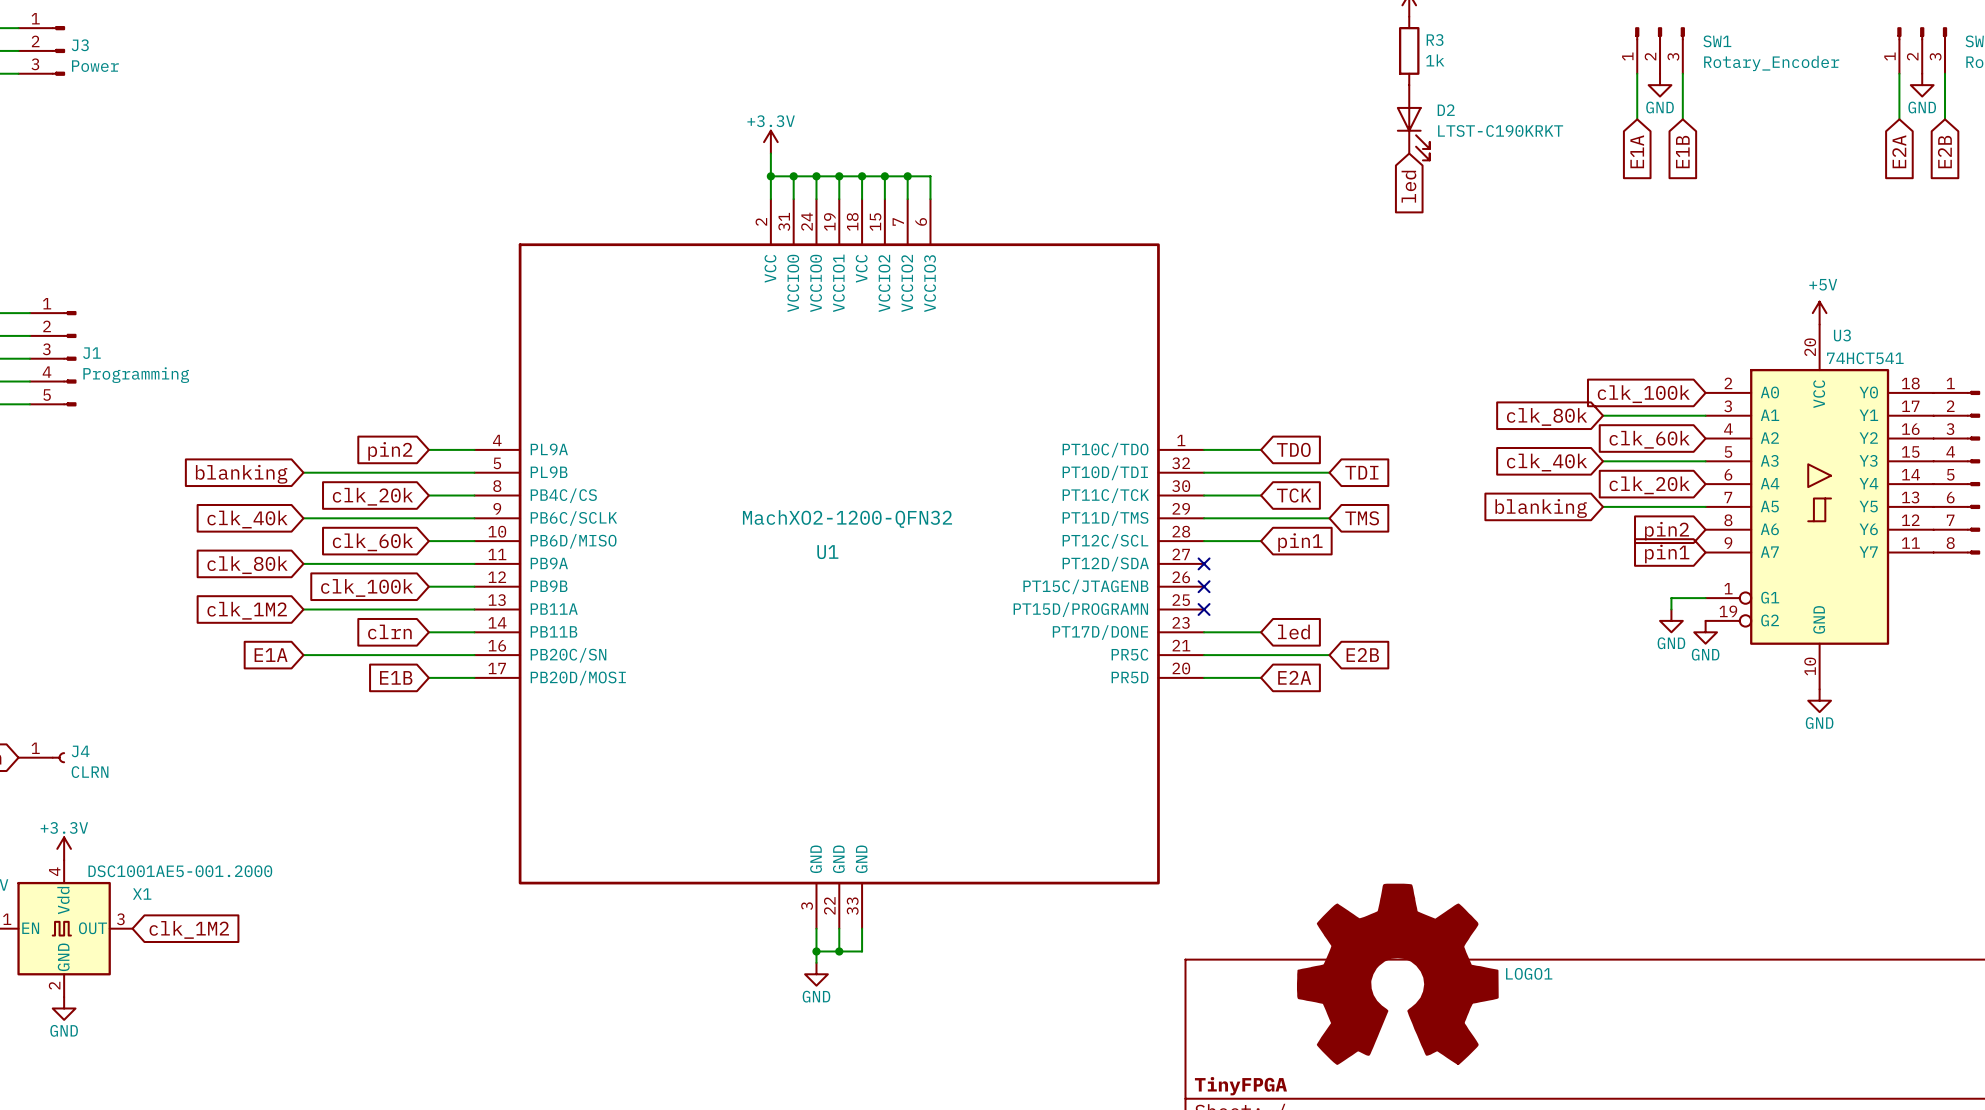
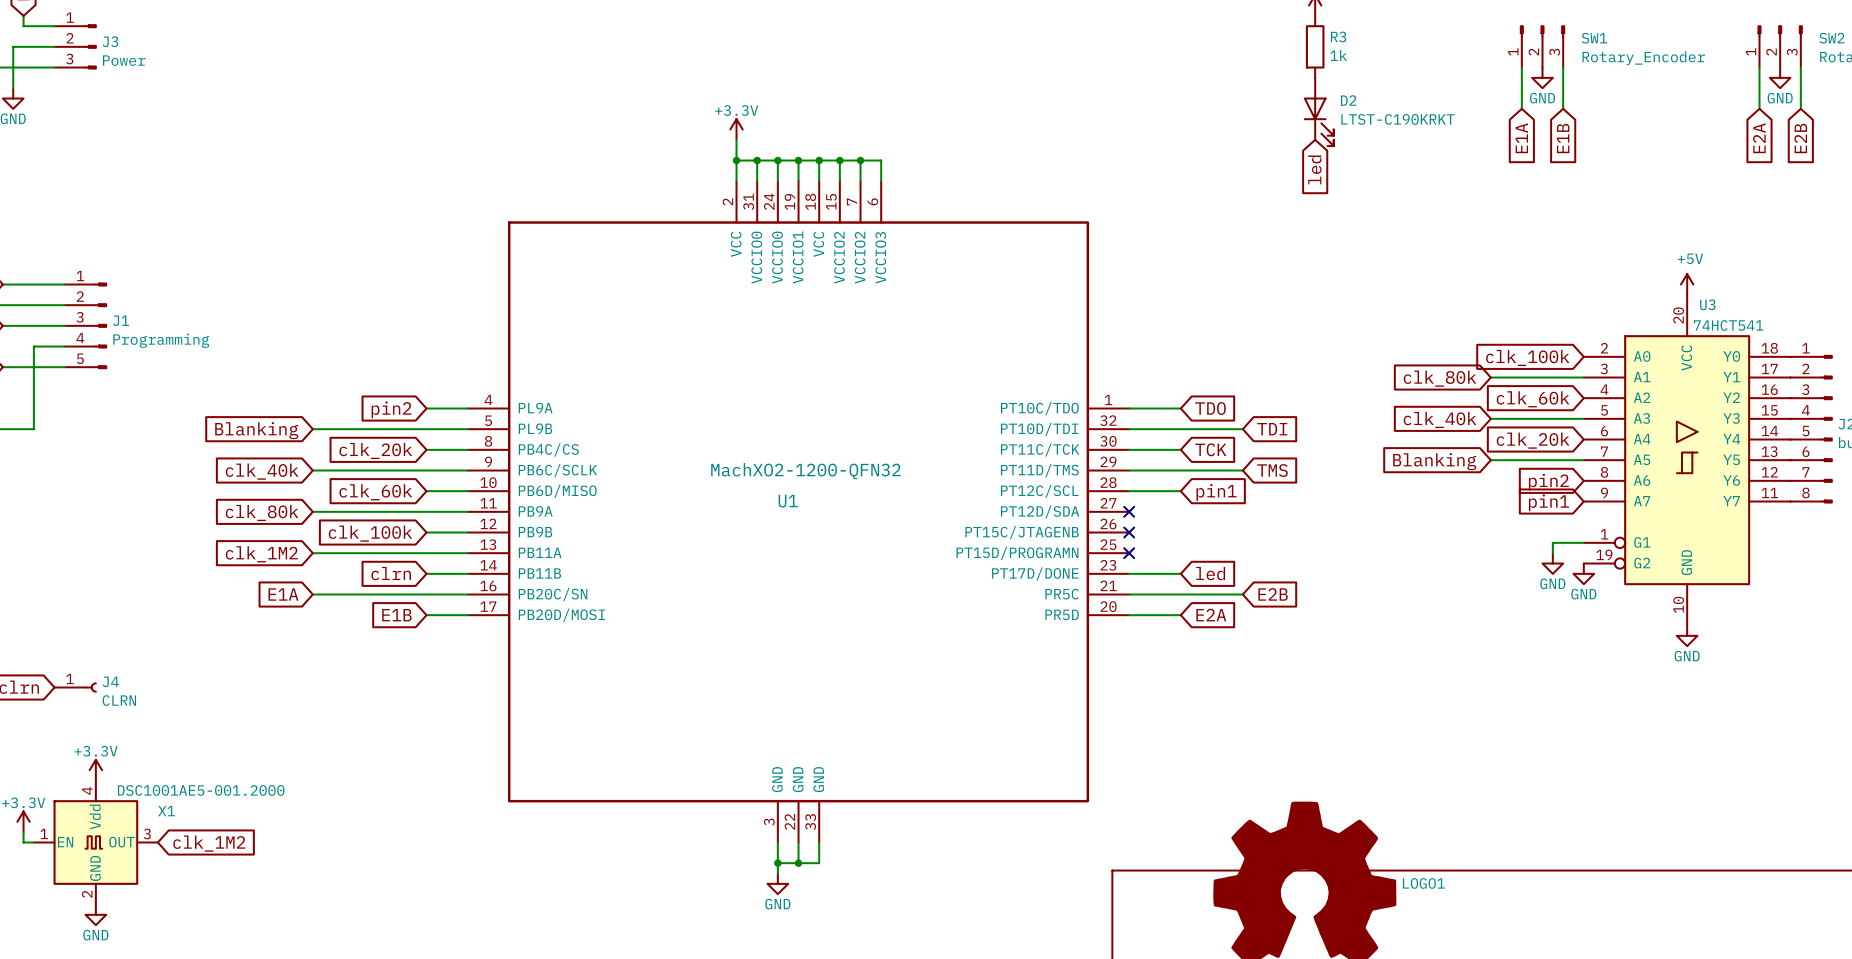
global label: blanking (241, 474) -> Blanking (256, 430)
global label: blanking (1541, 508) -> Blanking (1434, 461)

